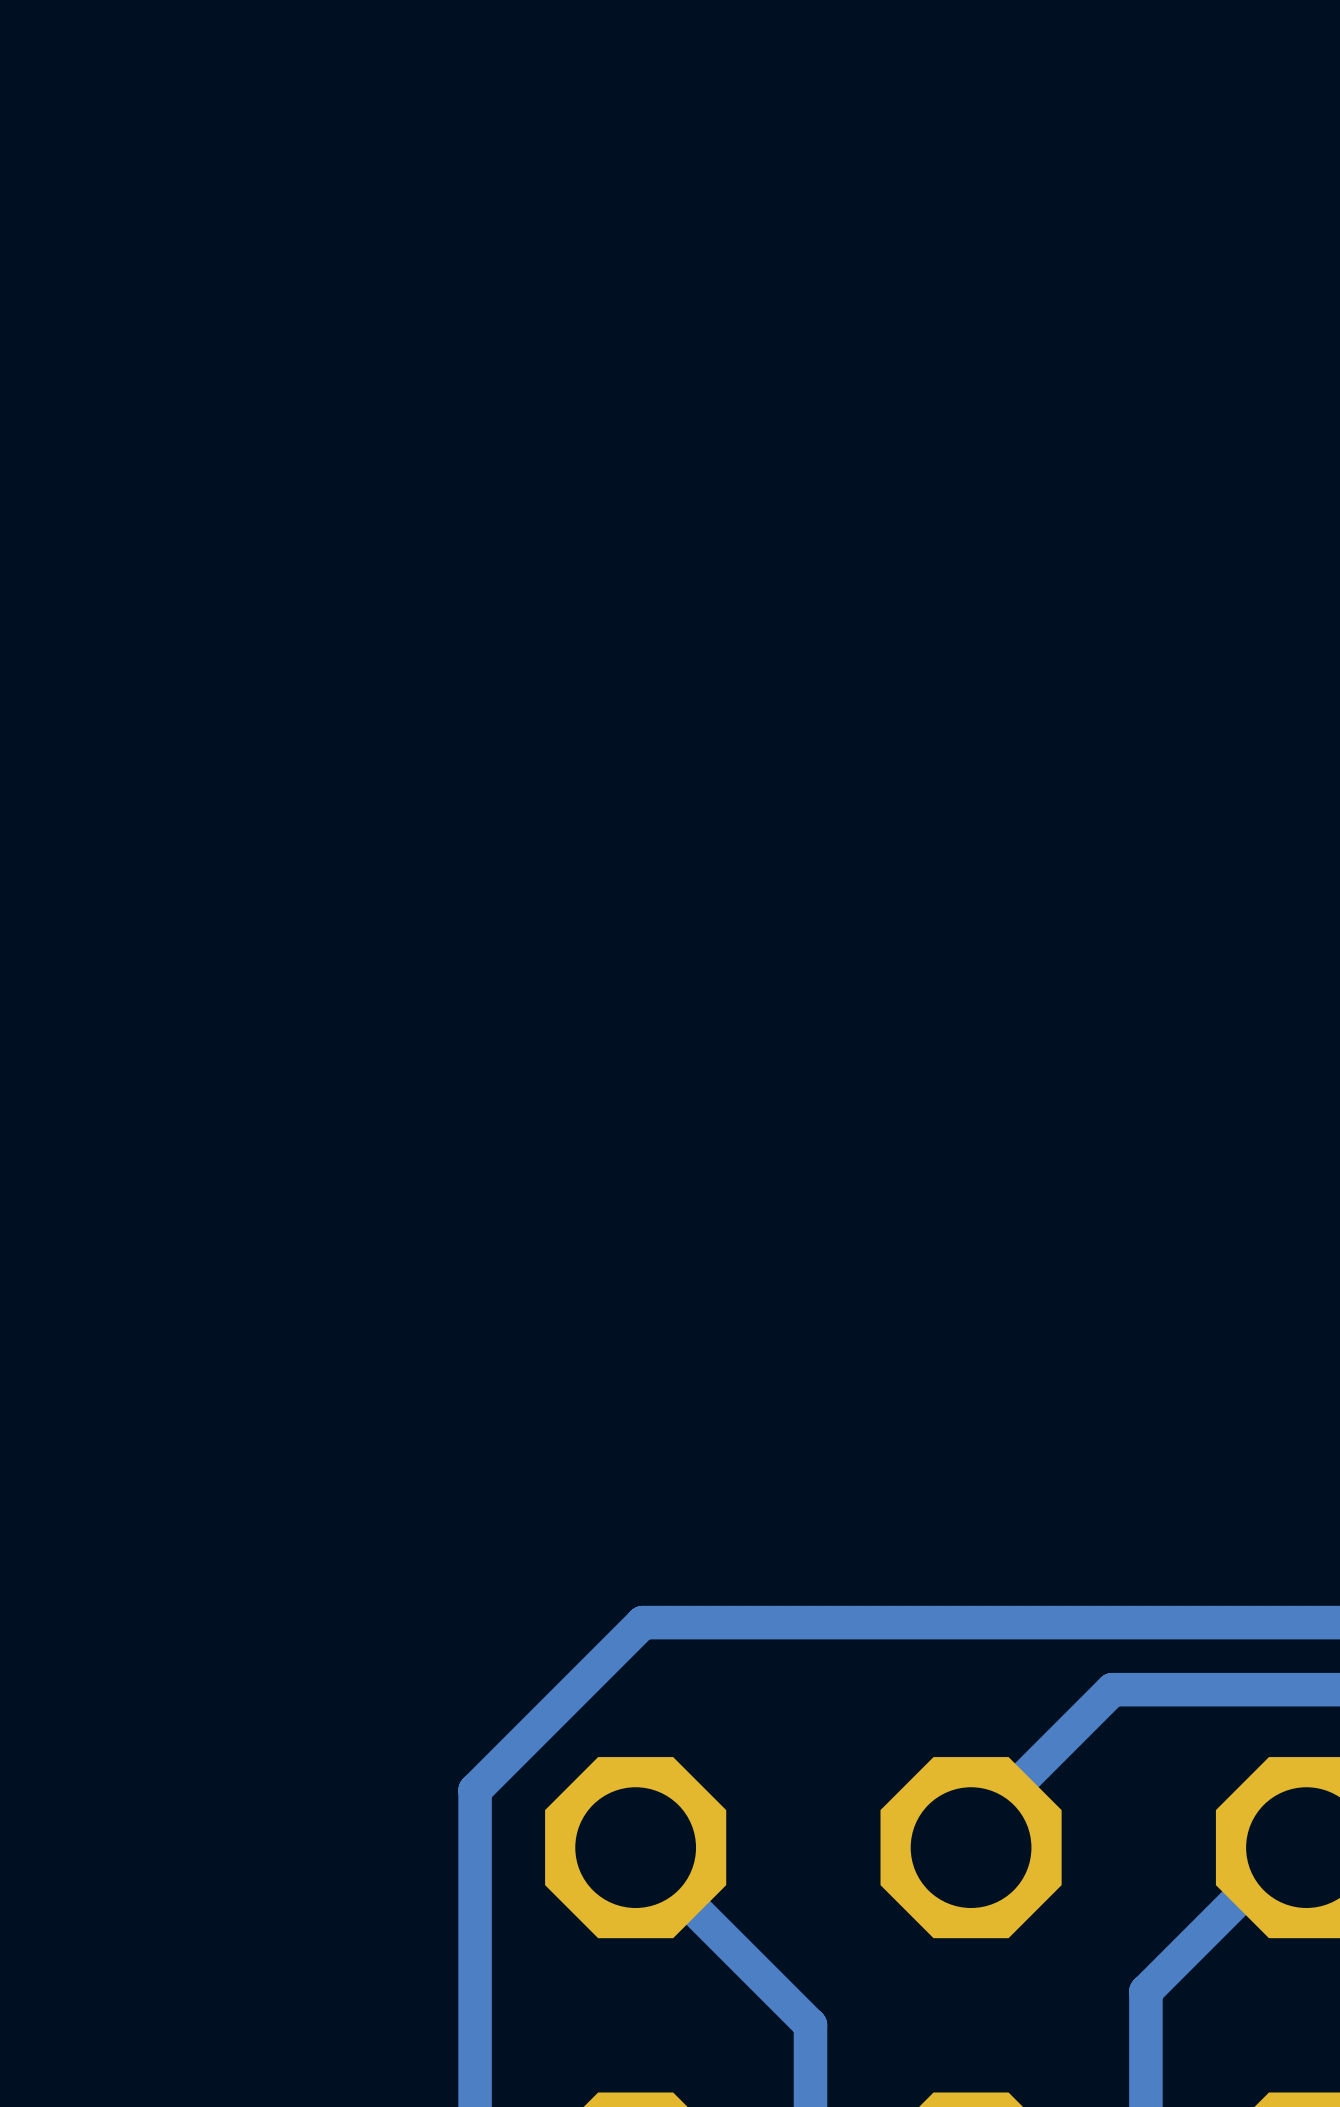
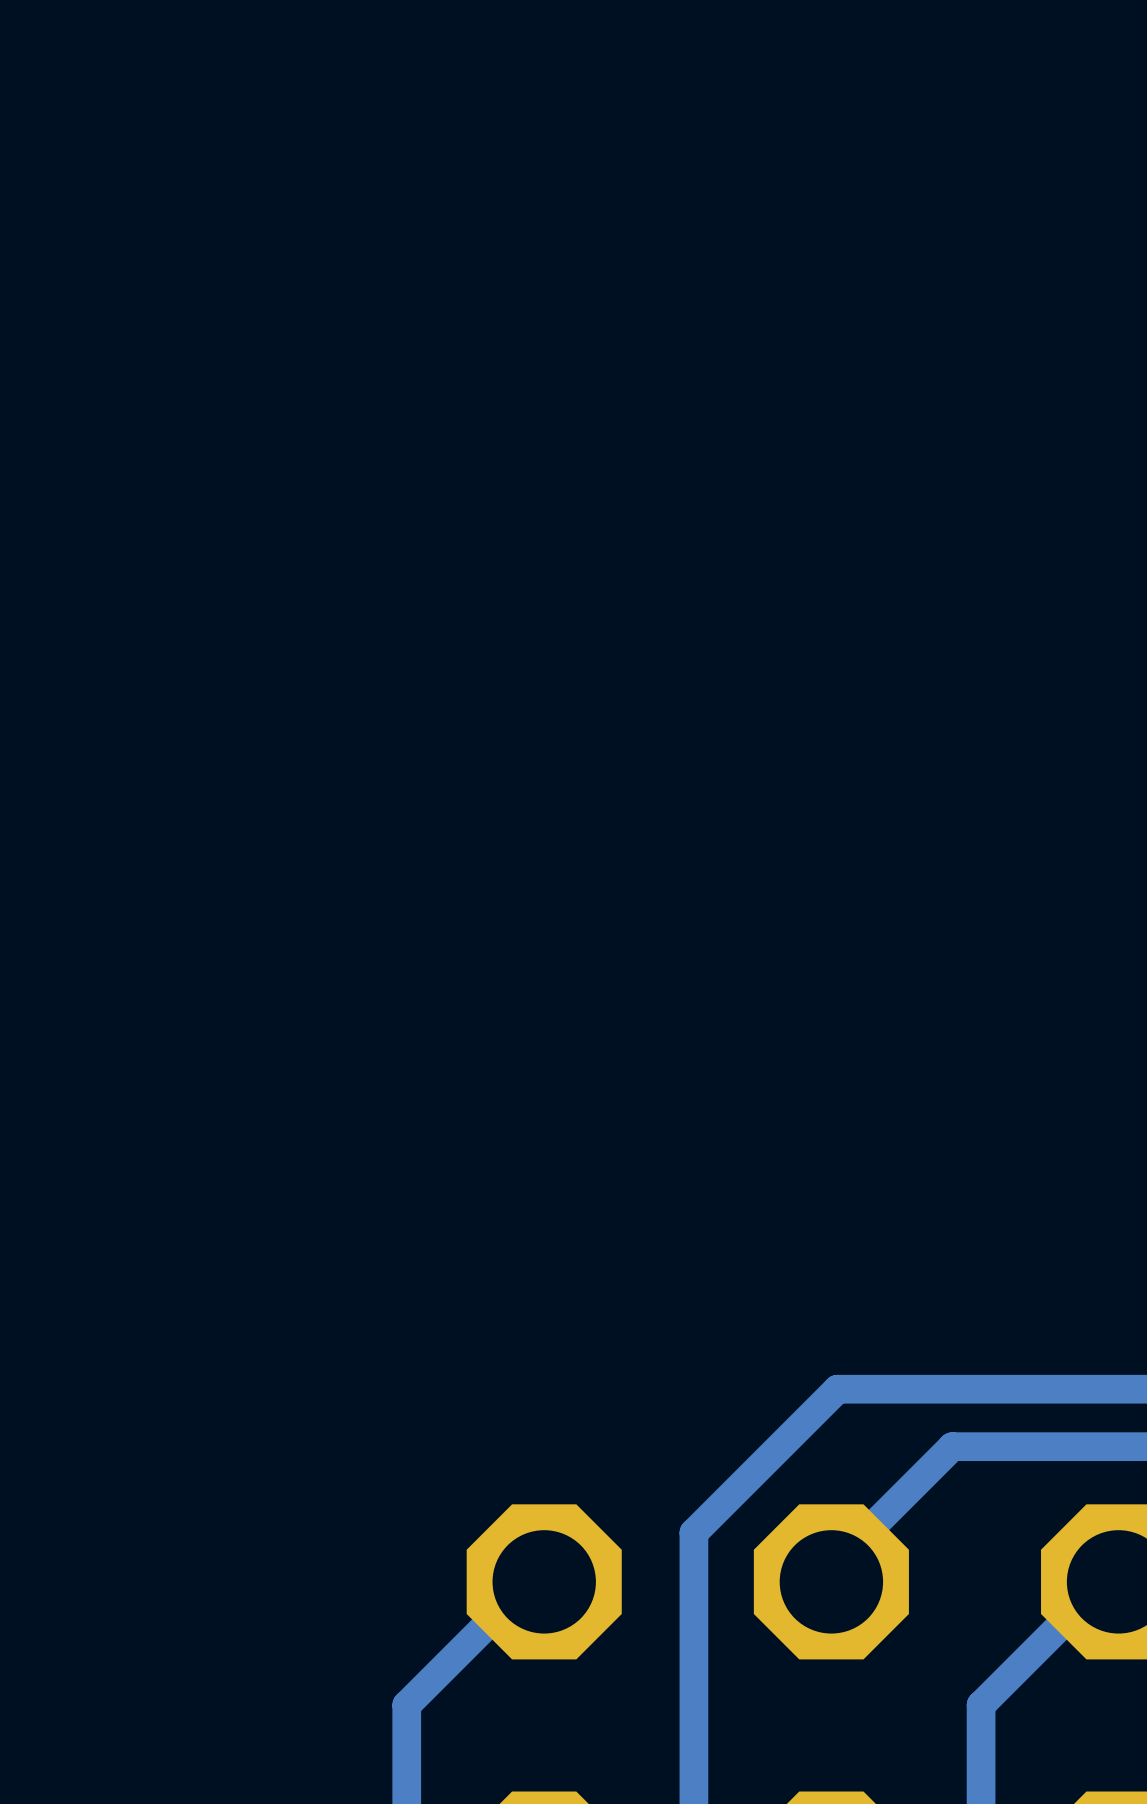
track: (978, 1622) (642, 1622) (475, 1790) (475, 1991) -> (837, 1389) (693, 1532) (693, 1733)
track: (635, 1847) (642, 1857) (810, 2025) -> (544, 1581) (521, 1590) (406, 1705)

